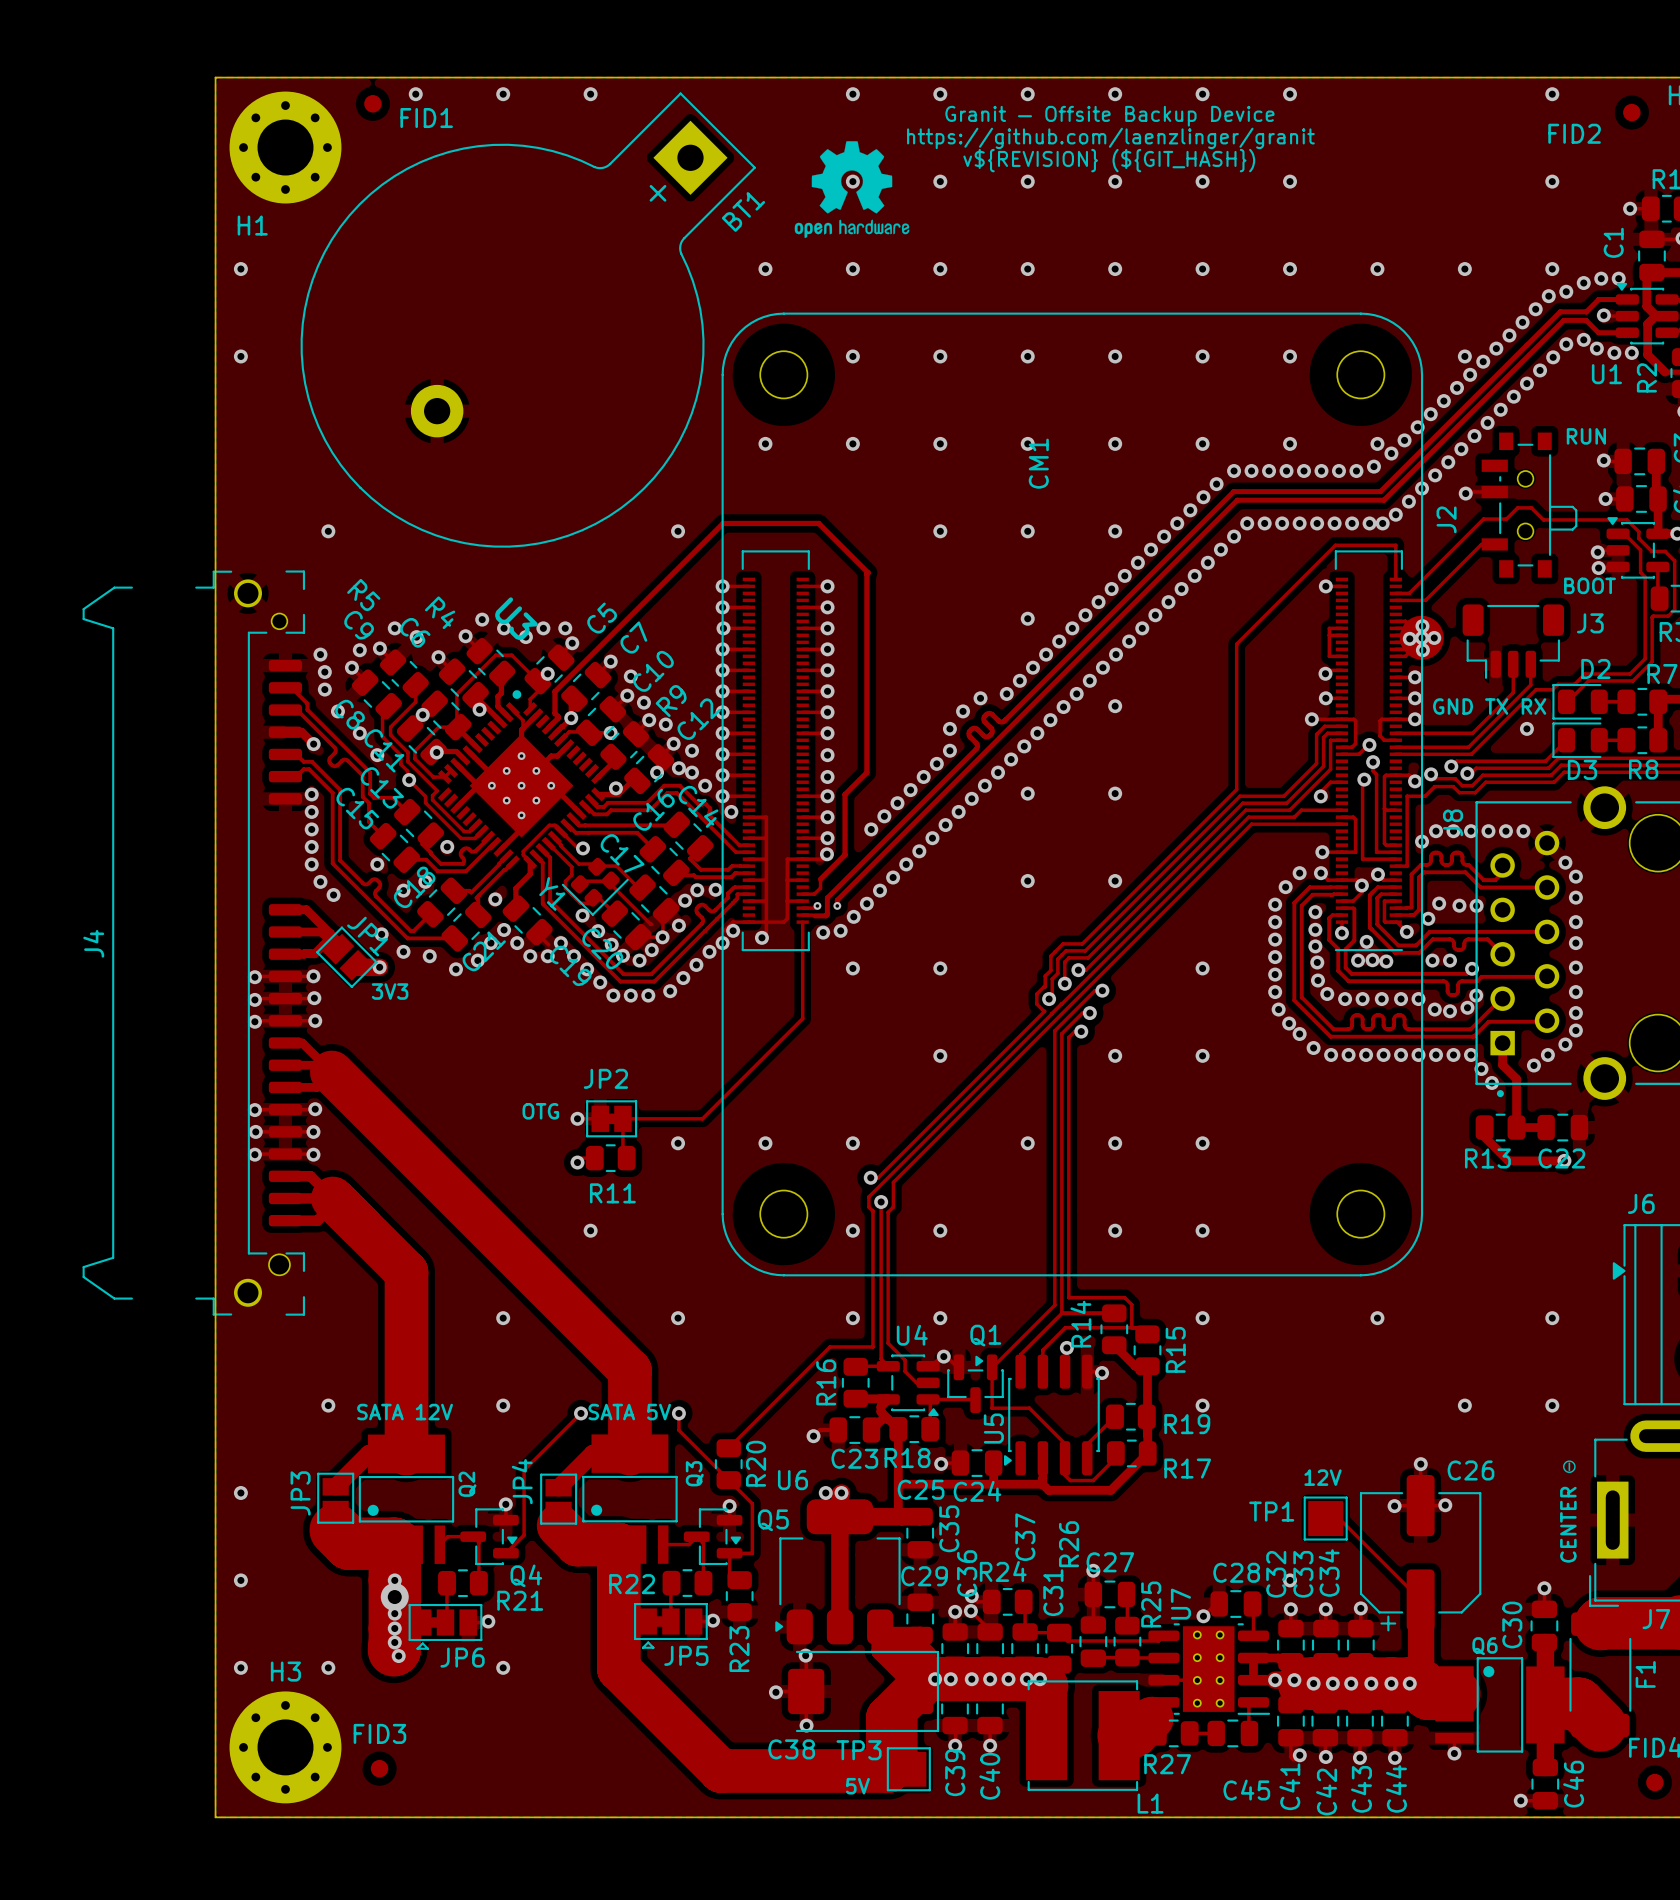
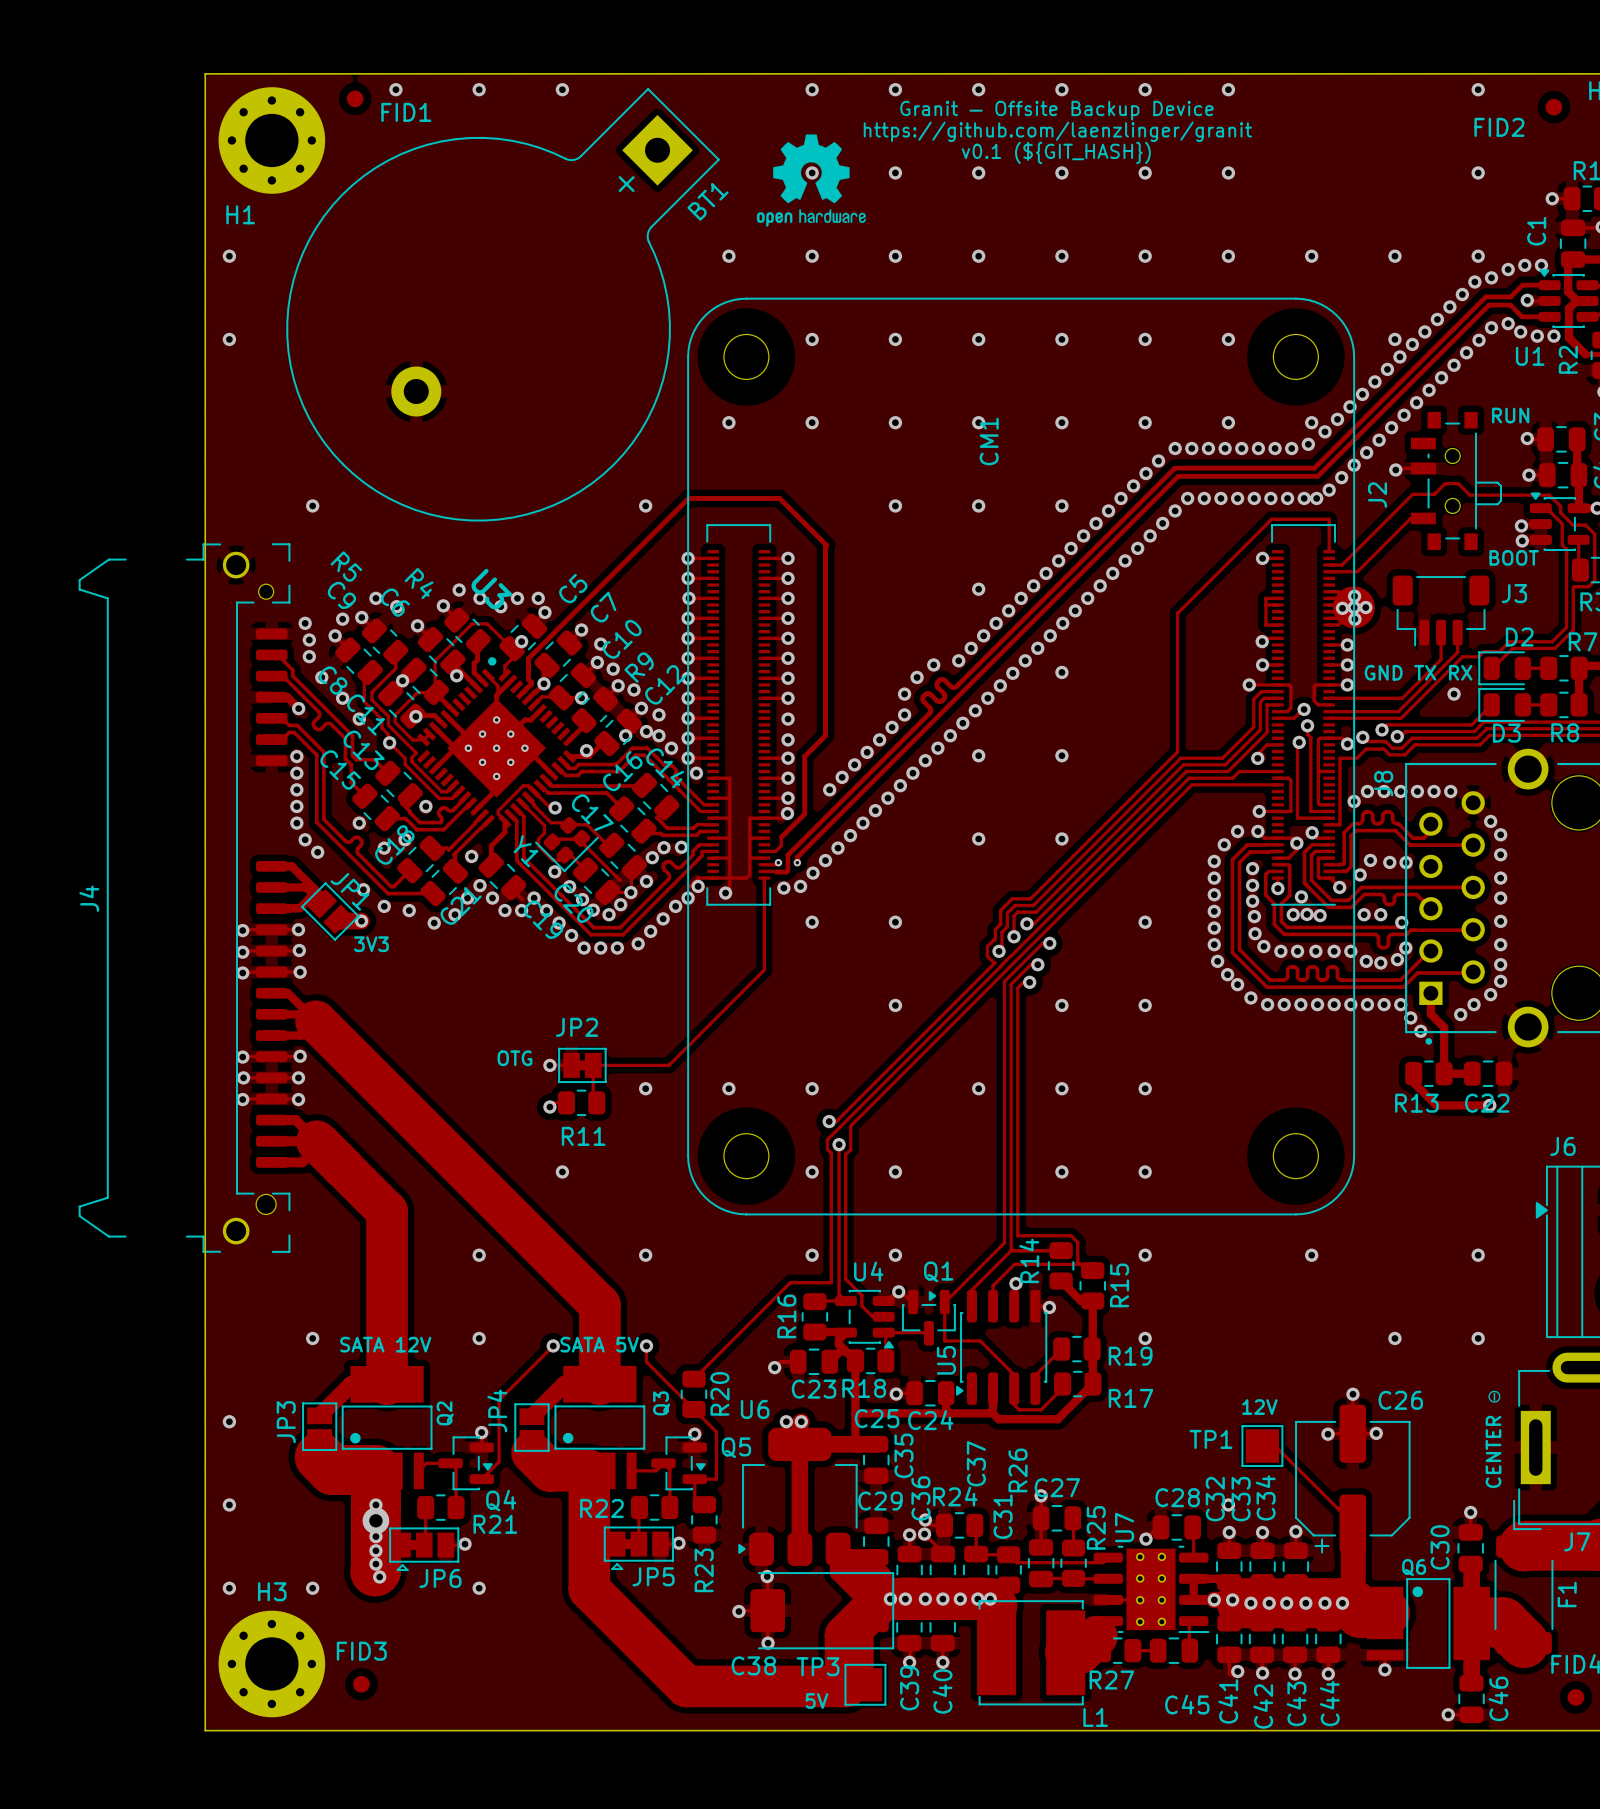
text: v${REVISION} (${GIT_HASH}) (1109, 160) -> v0.1 (${GIT_HASH}) (1056, 152)

